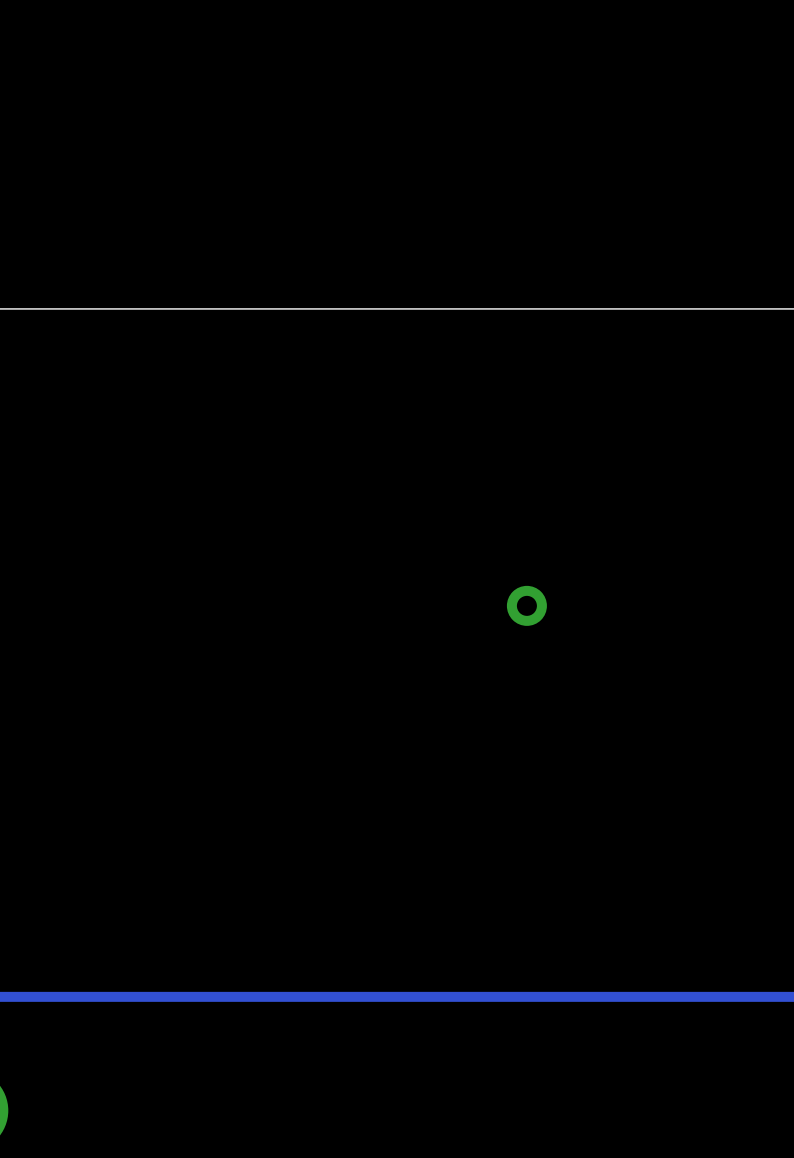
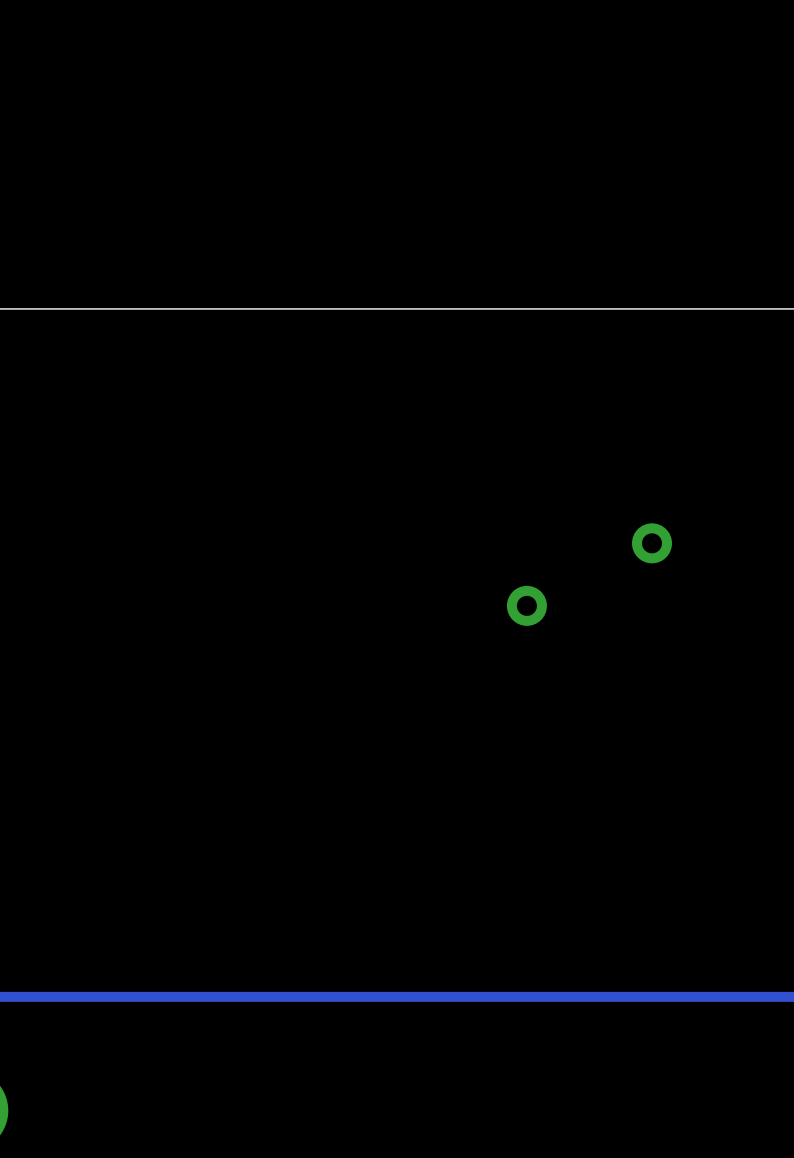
via: none -> (651, 543)

